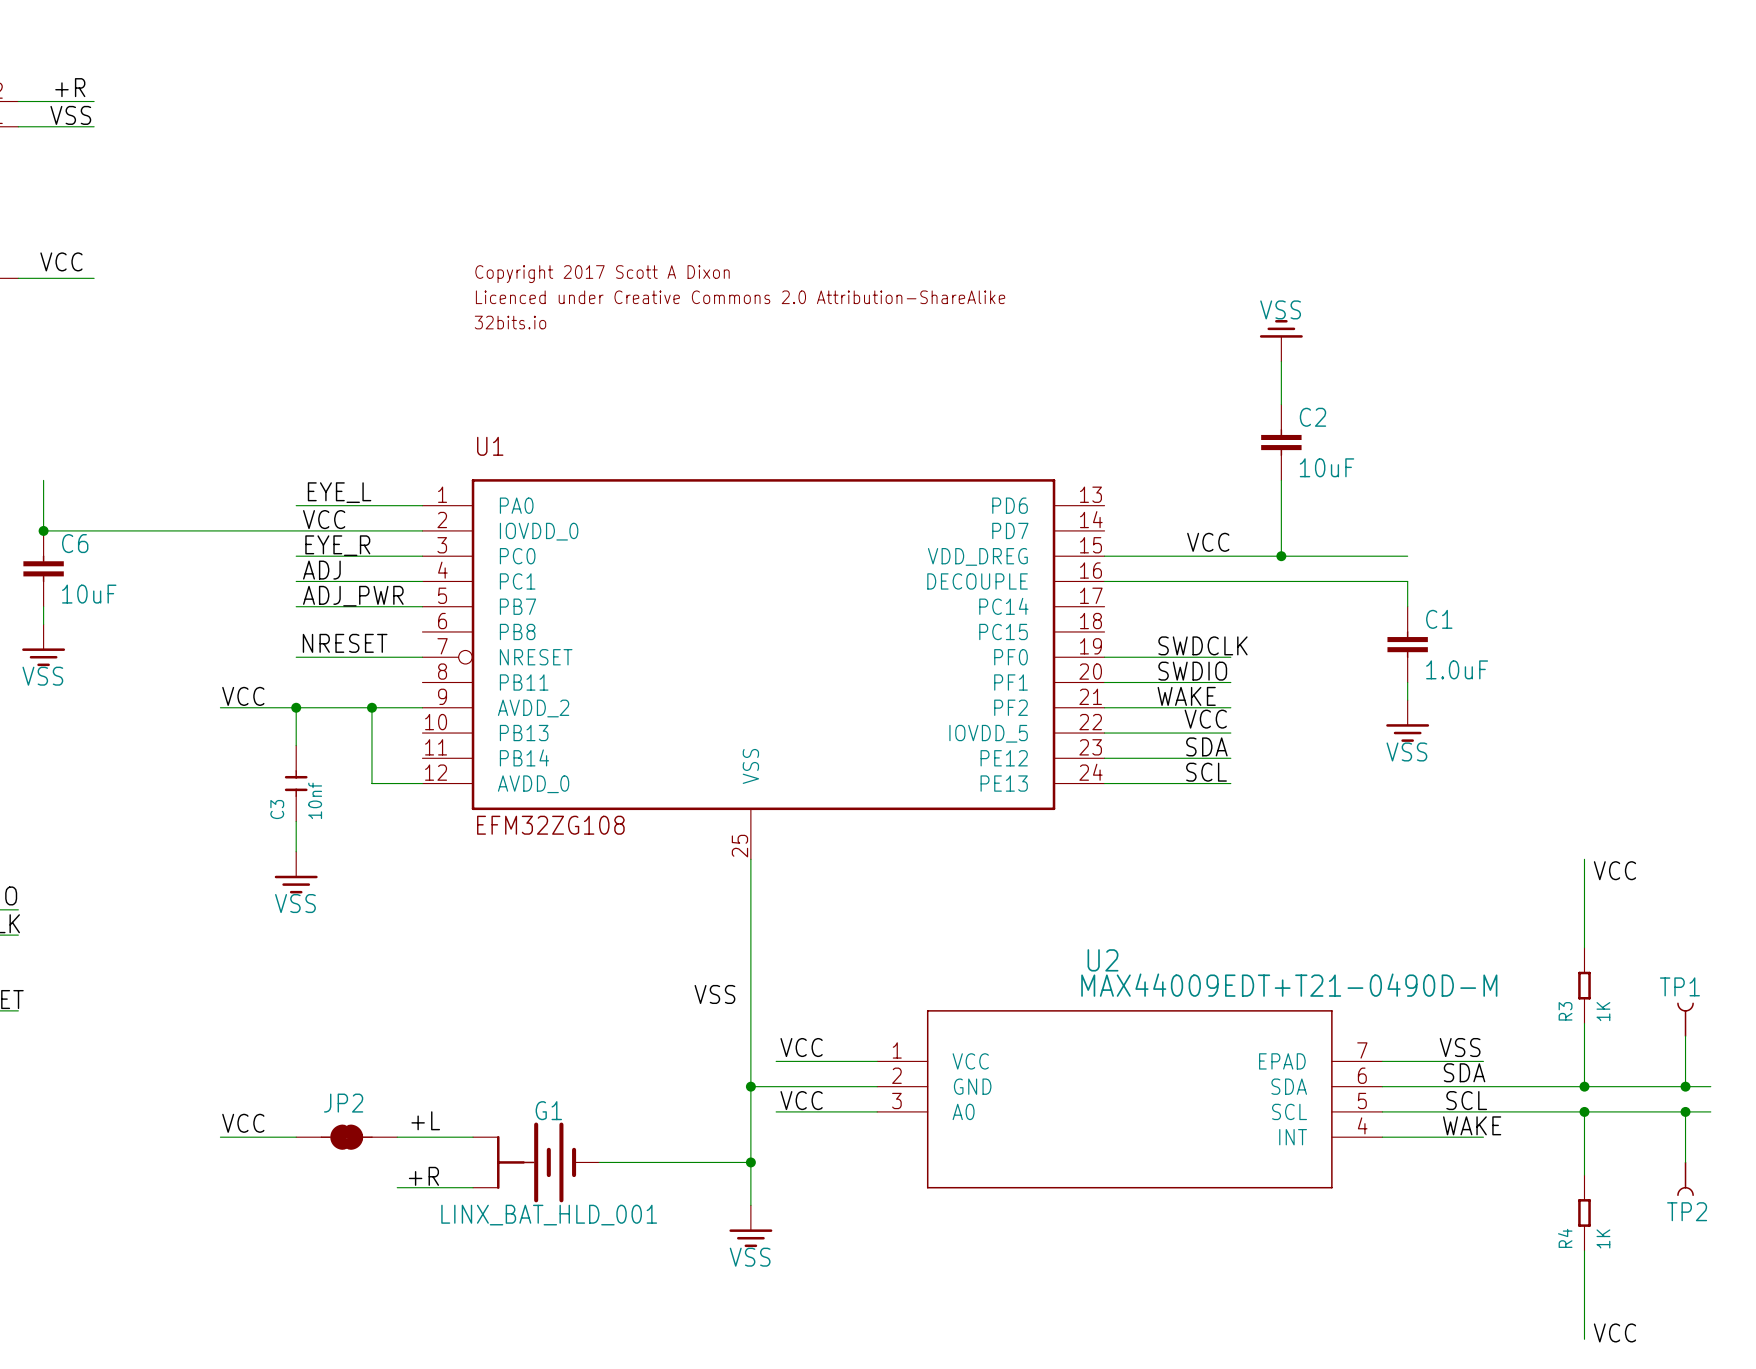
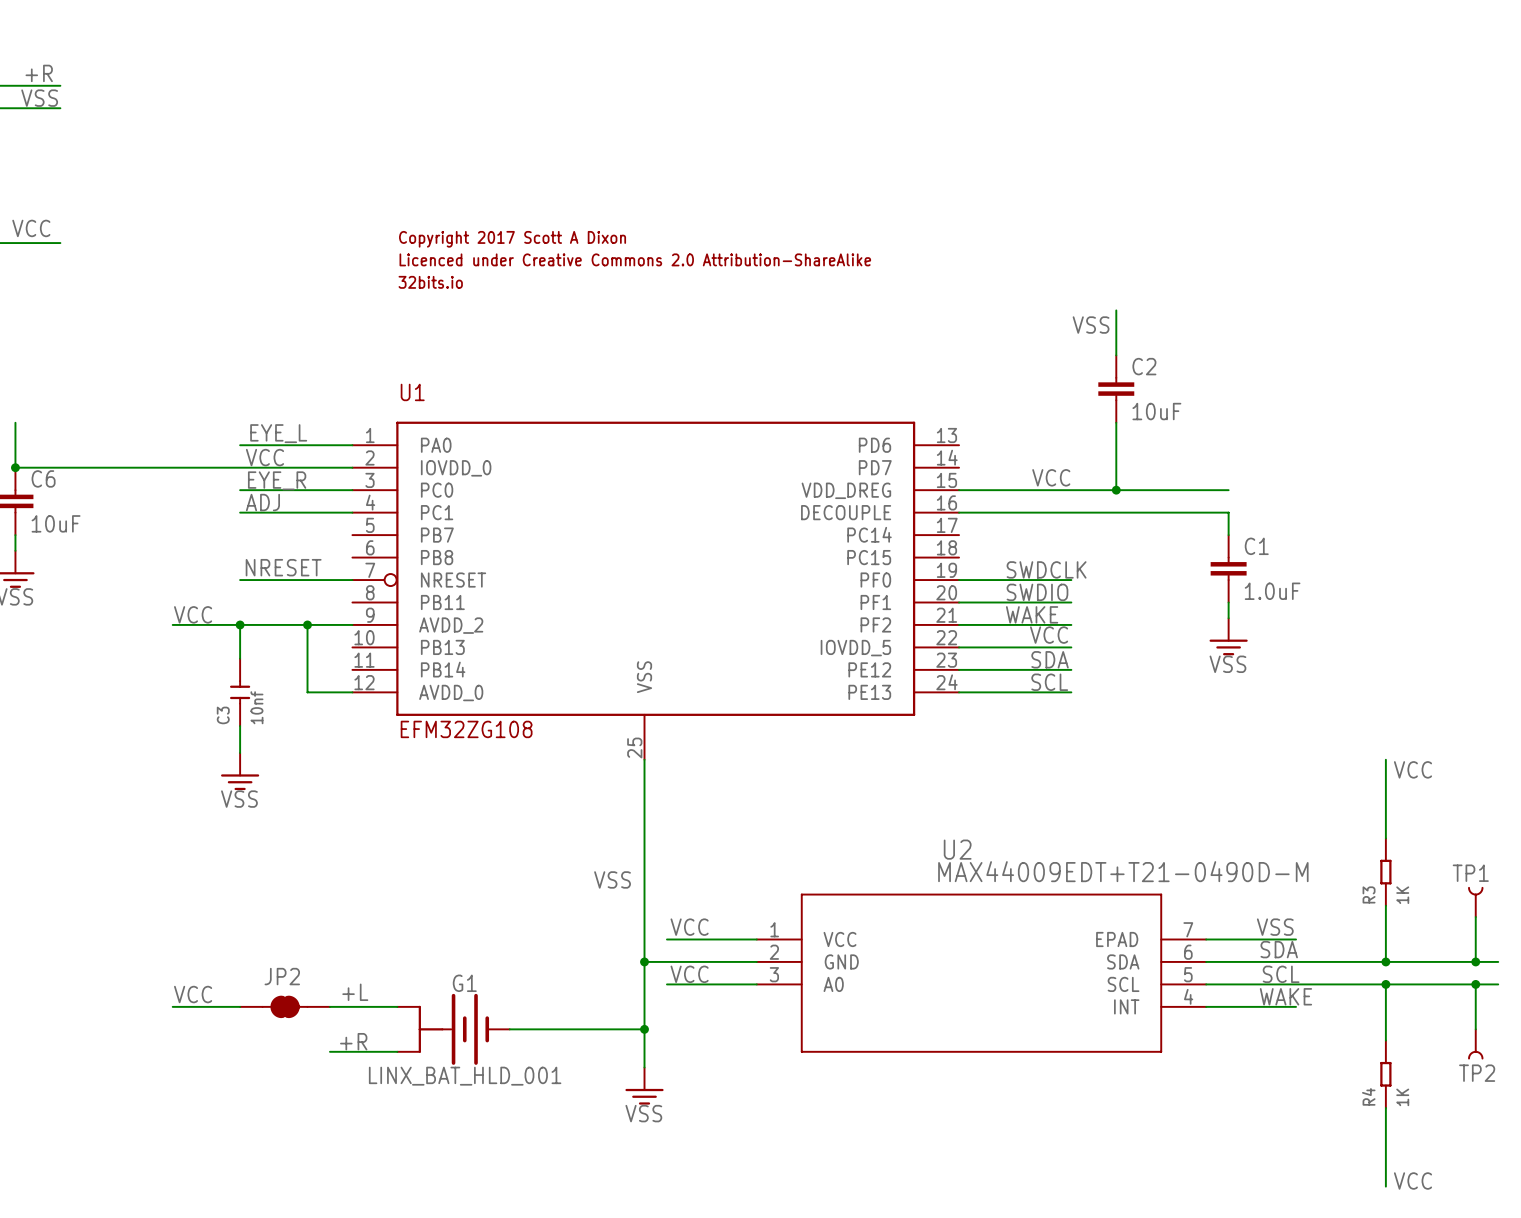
power symbol: VSS (1281, 340) -> none
label: none -> VSS (1091, 325)
label: ADJ_PWR (353, 596) -> none
wire: (296, 606) (422, 606) -> none

